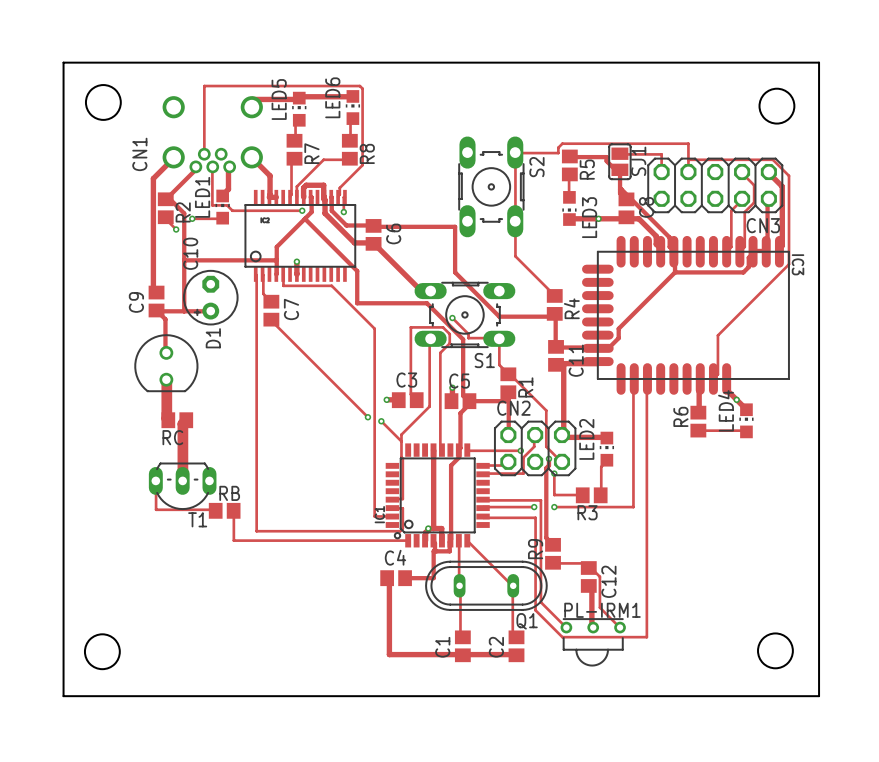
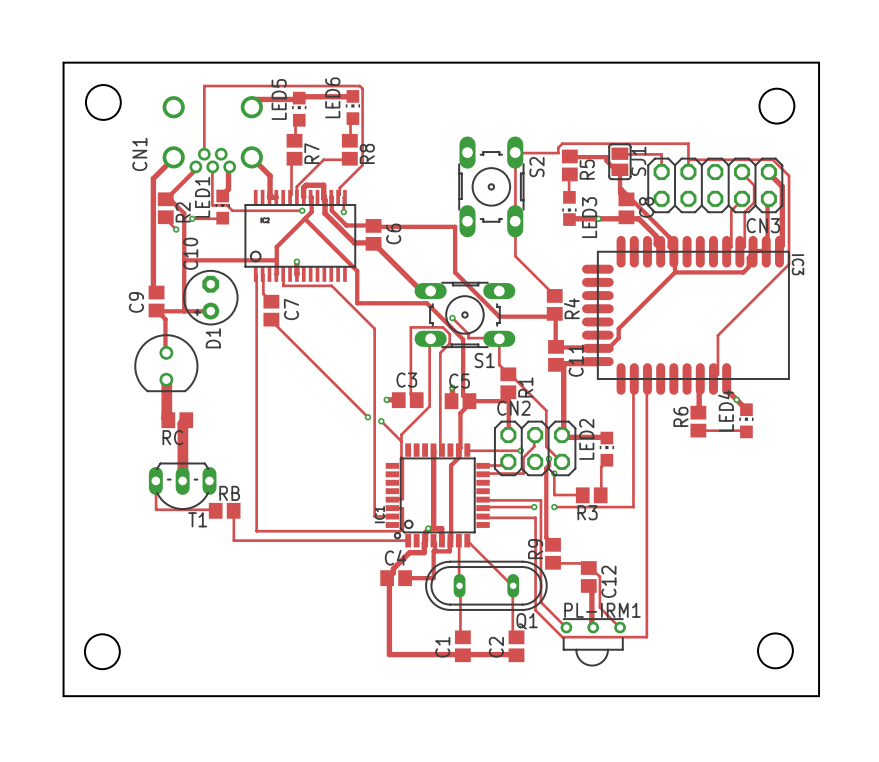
track: none -> (425, 540) (424, 552) (409, 552) (393, 568) (393, 572) (387, 578) (389, 579)

